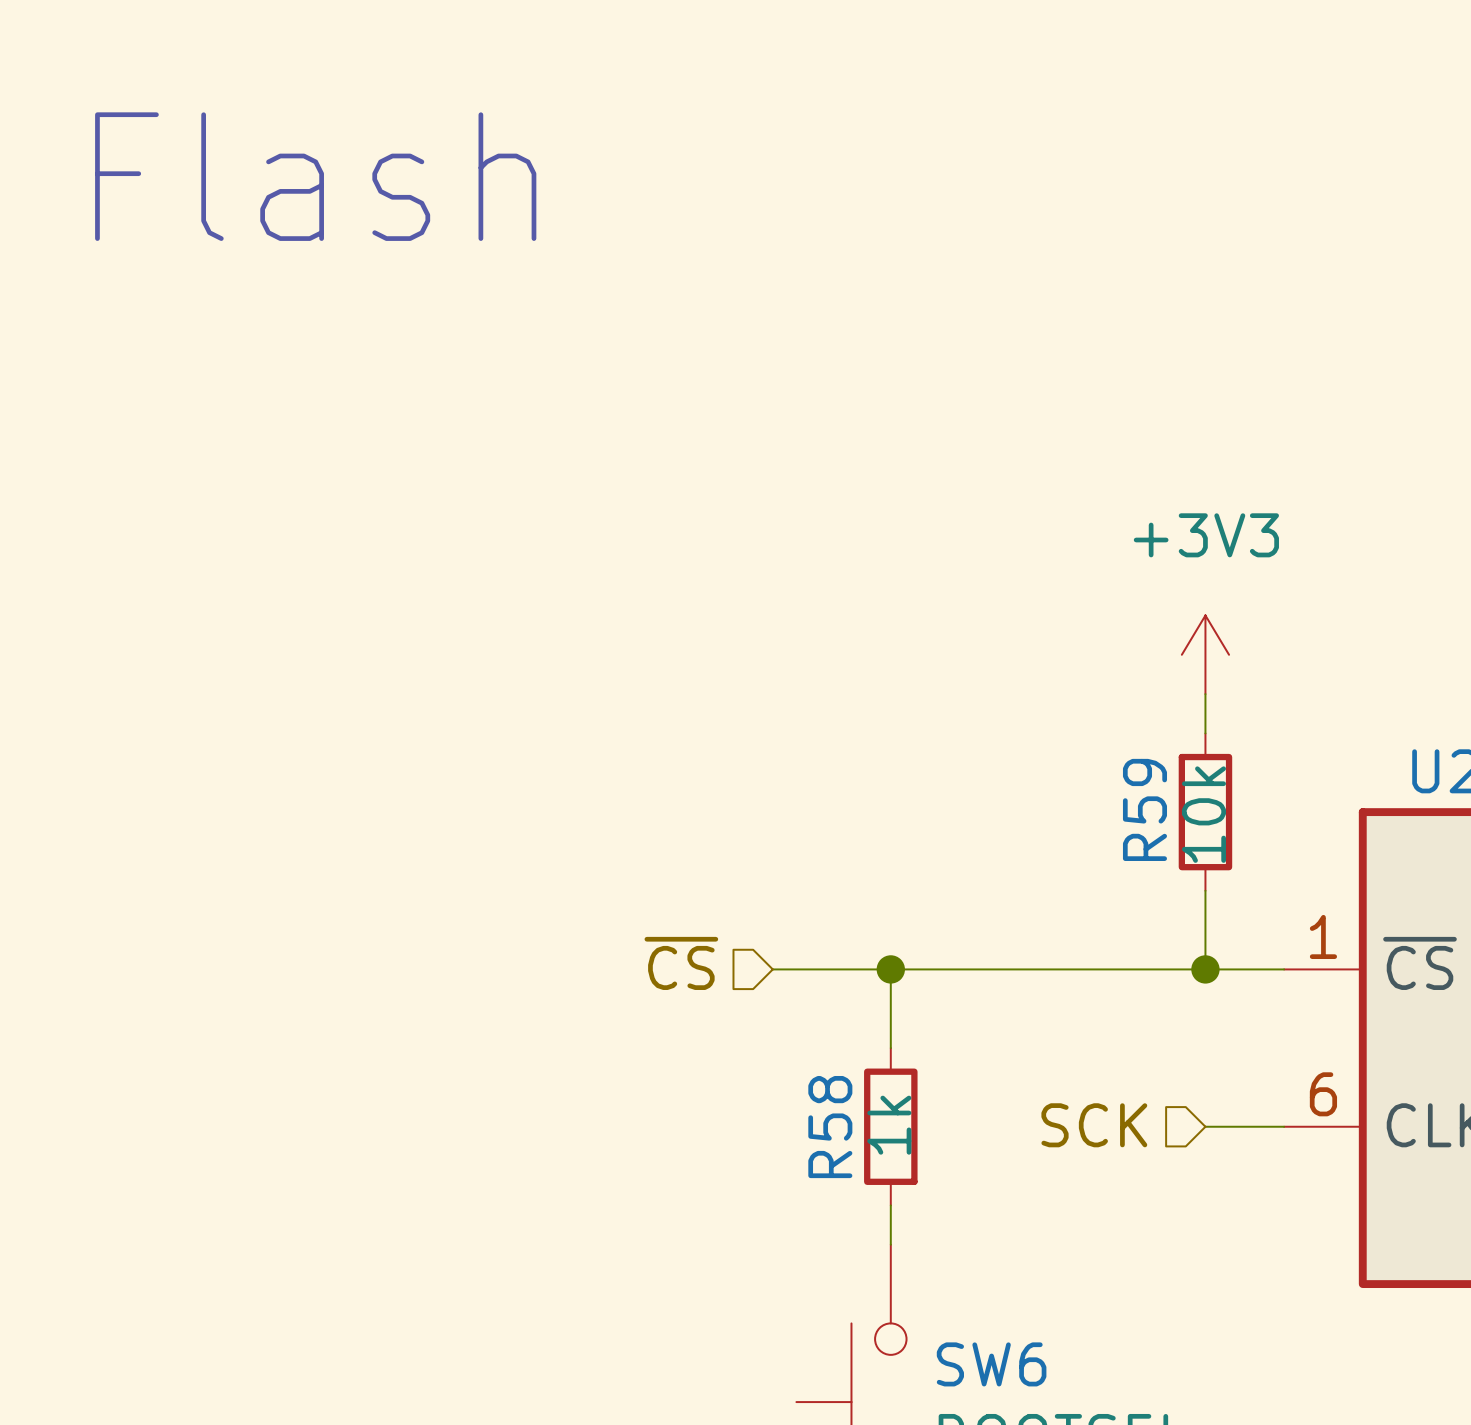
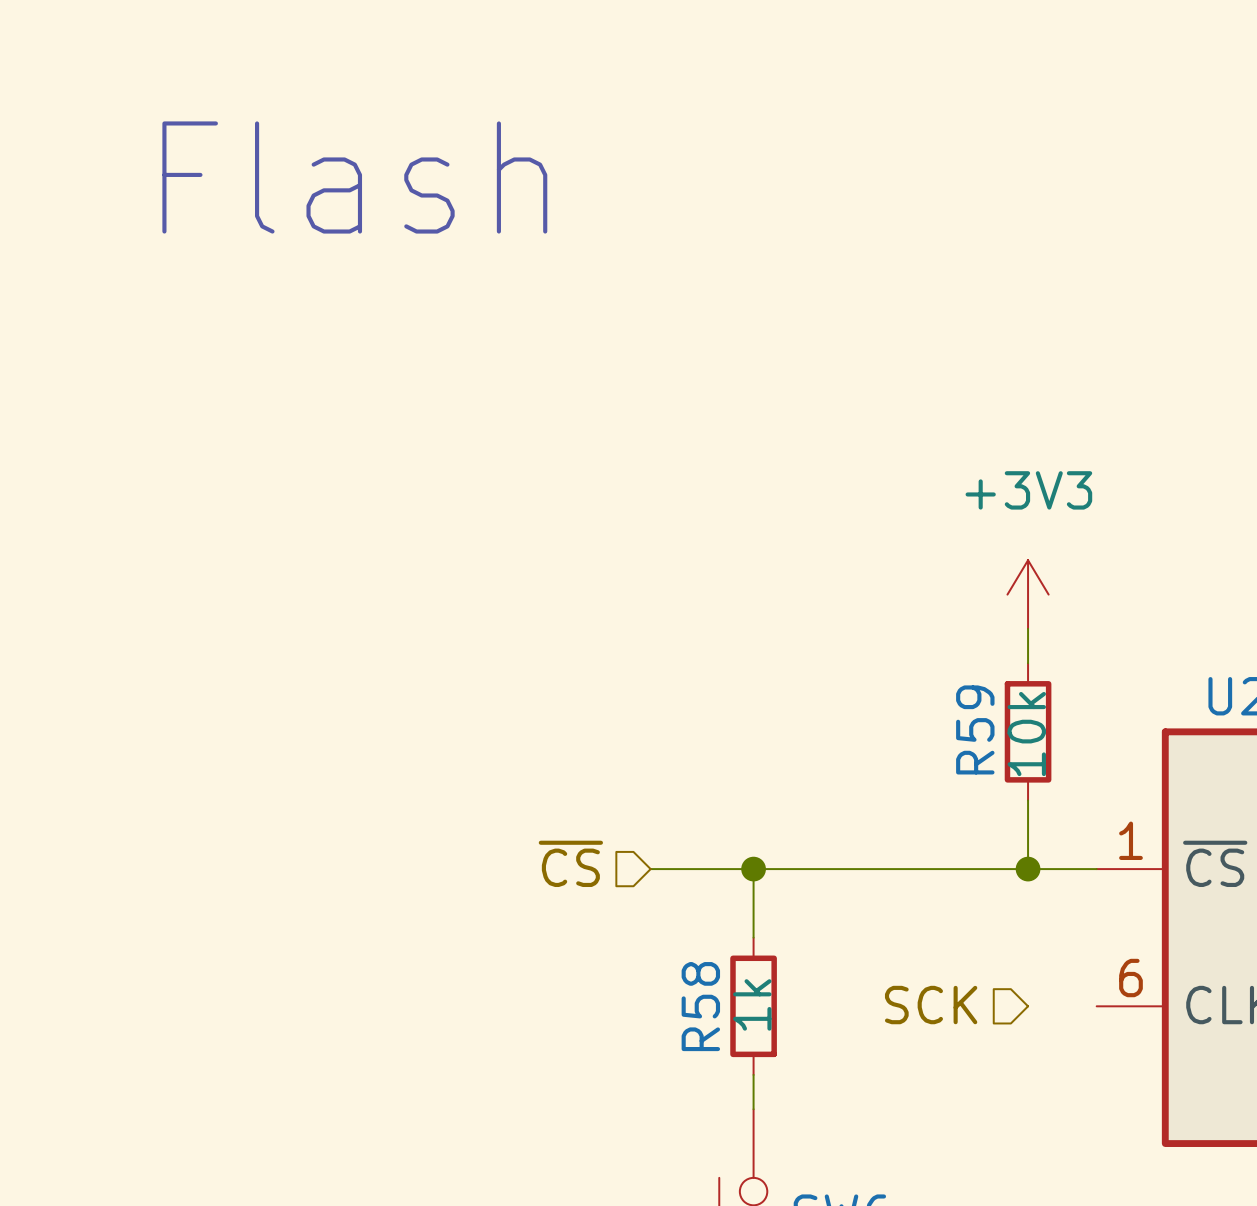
text position: Flash (315, 176) -> Flash (354, 177)
wire: (1205, 1126) (1284, 1126) -> none

